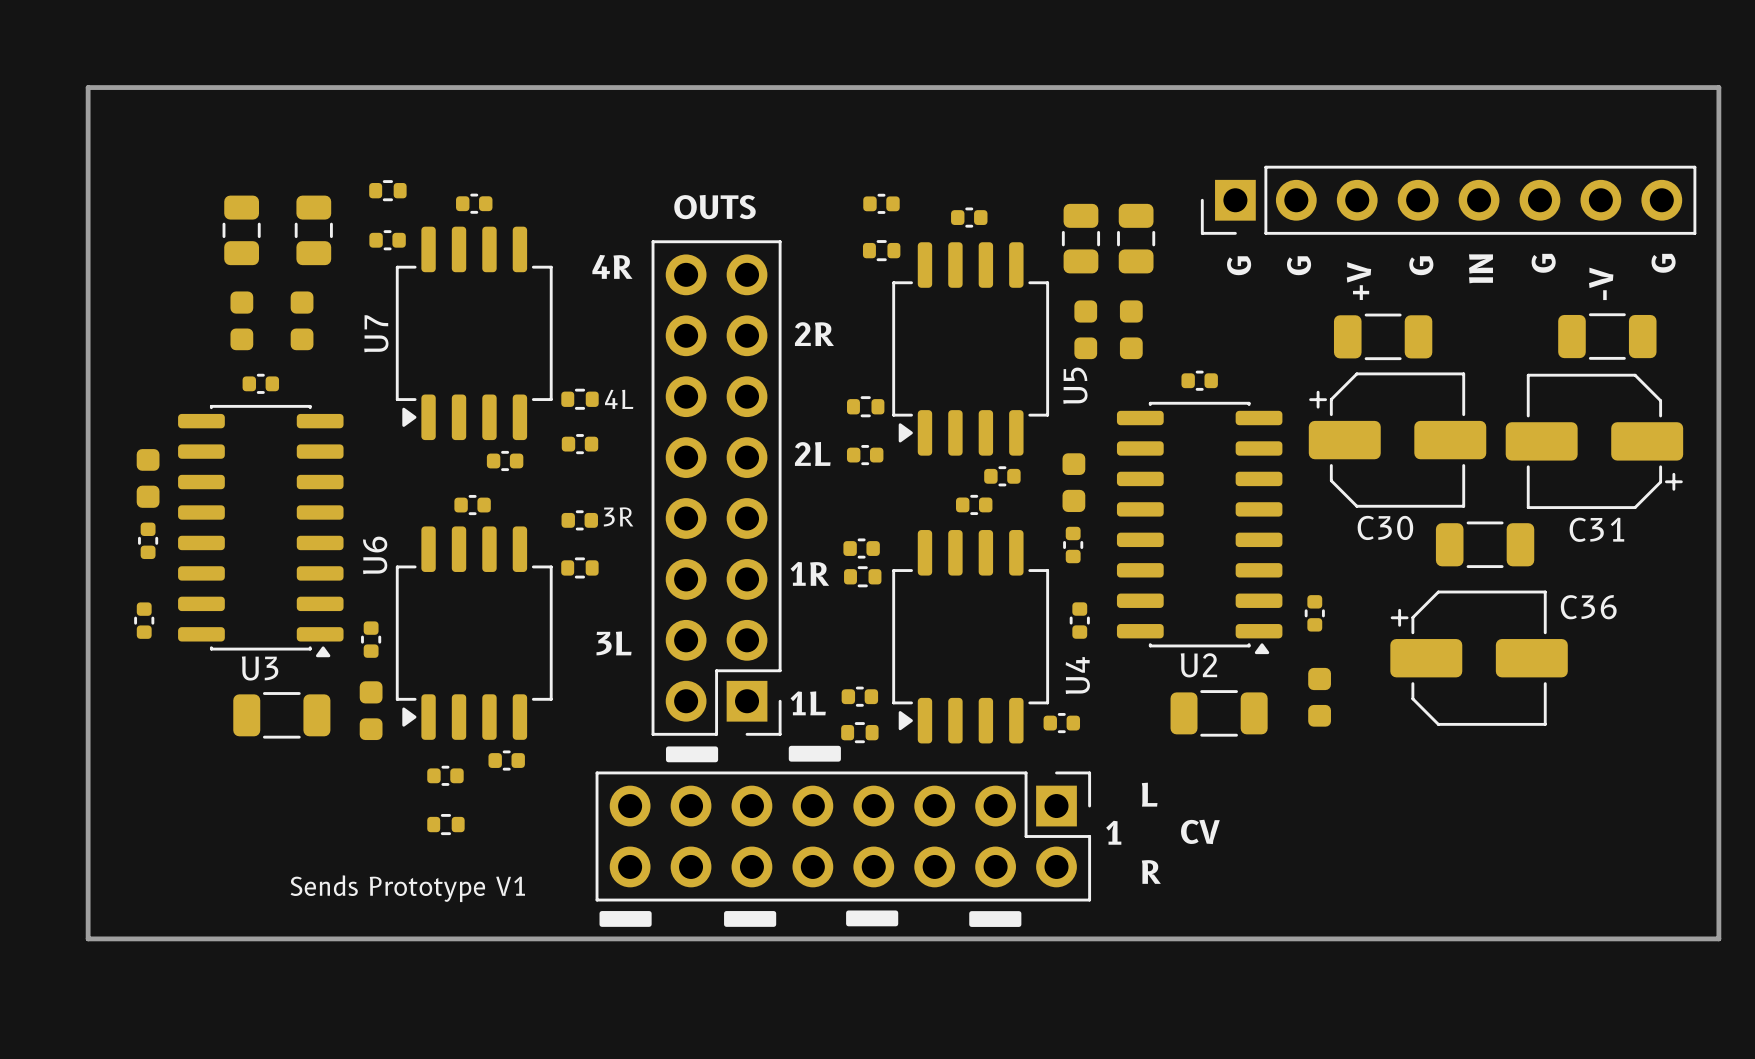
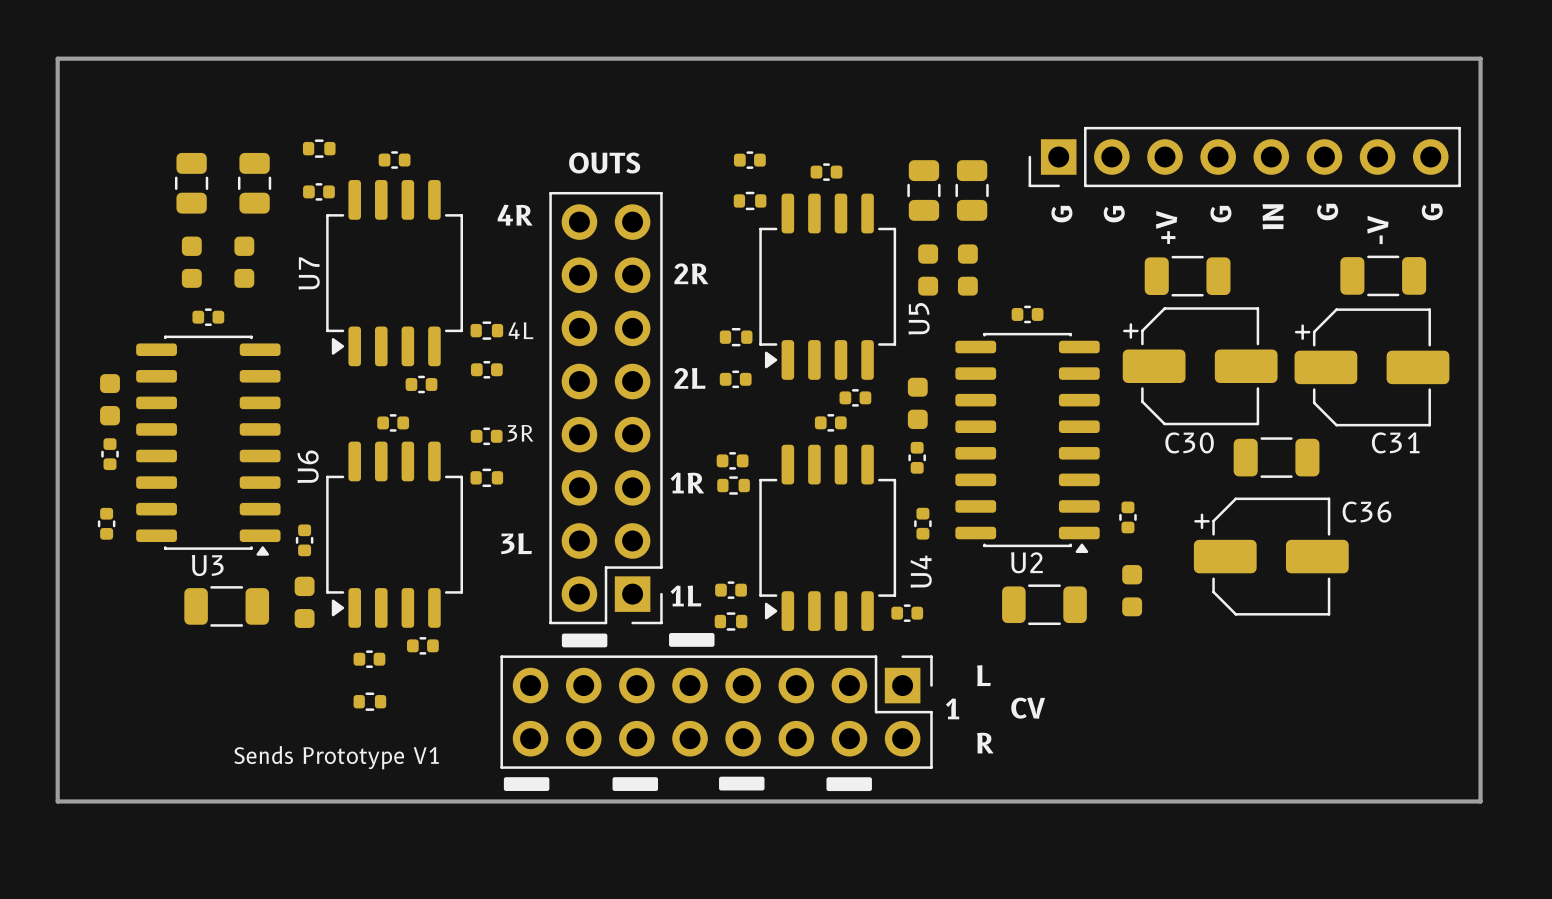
C31 rotation: 0° (1594, 441) -> 180° (1371, 367)

